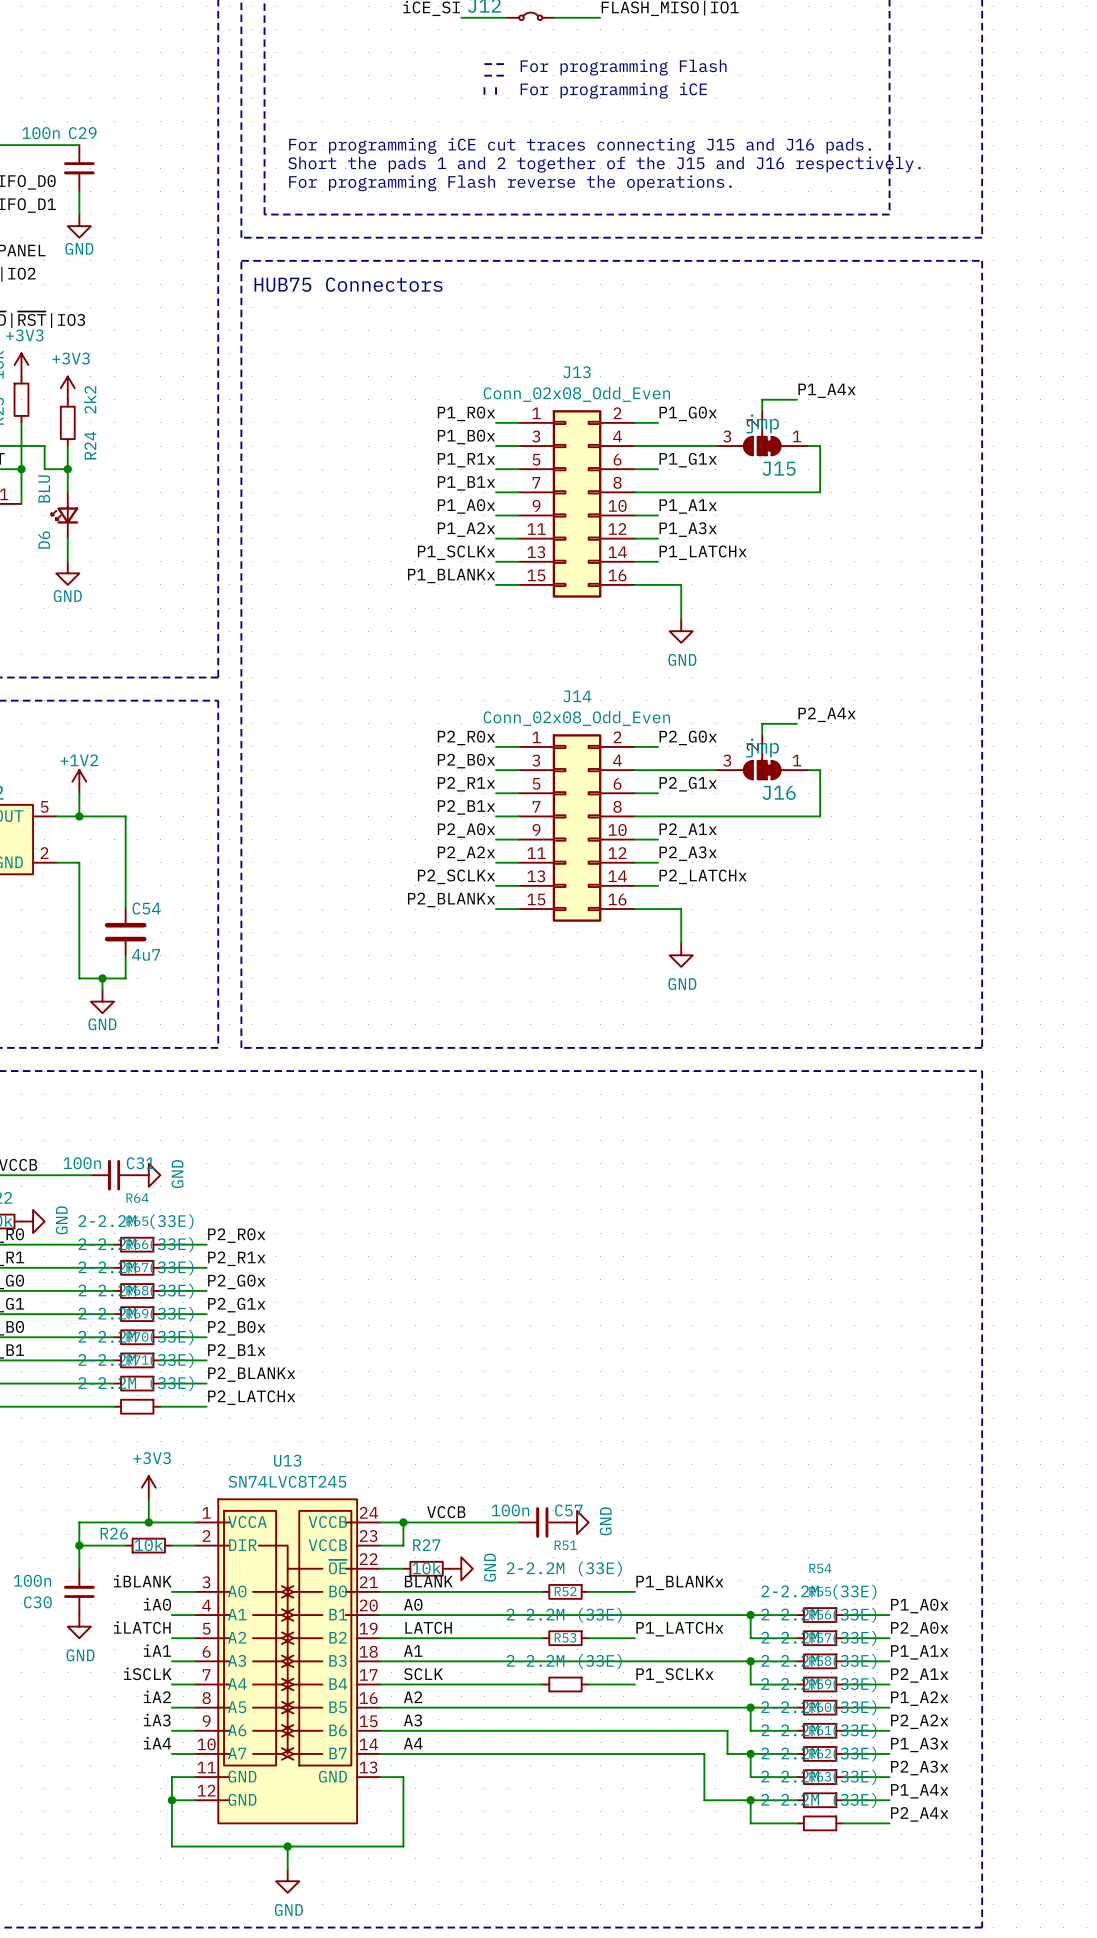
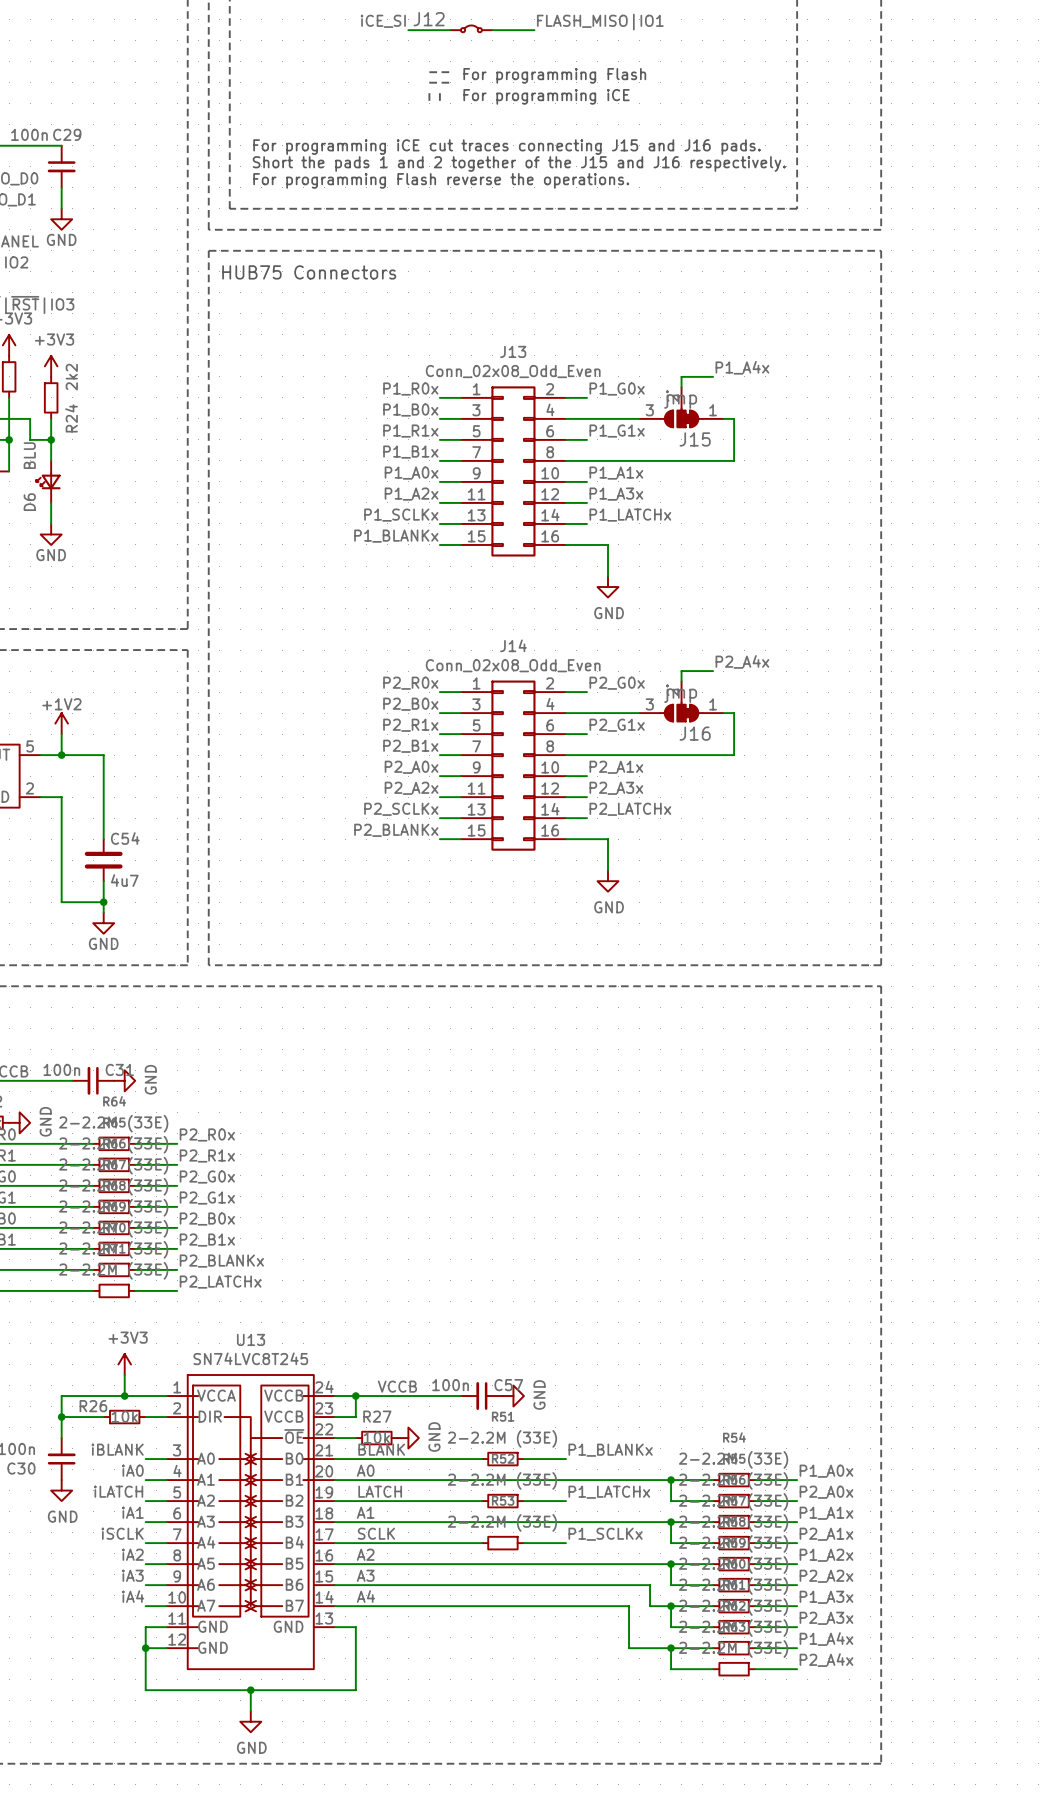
wire: (102, 978) (102, 990) -> (103, 902) (103, 912)
junction position: (102, 978) -> (103, 902)
power symbol position: GND (102, 1001) -> GND (103, 923)

